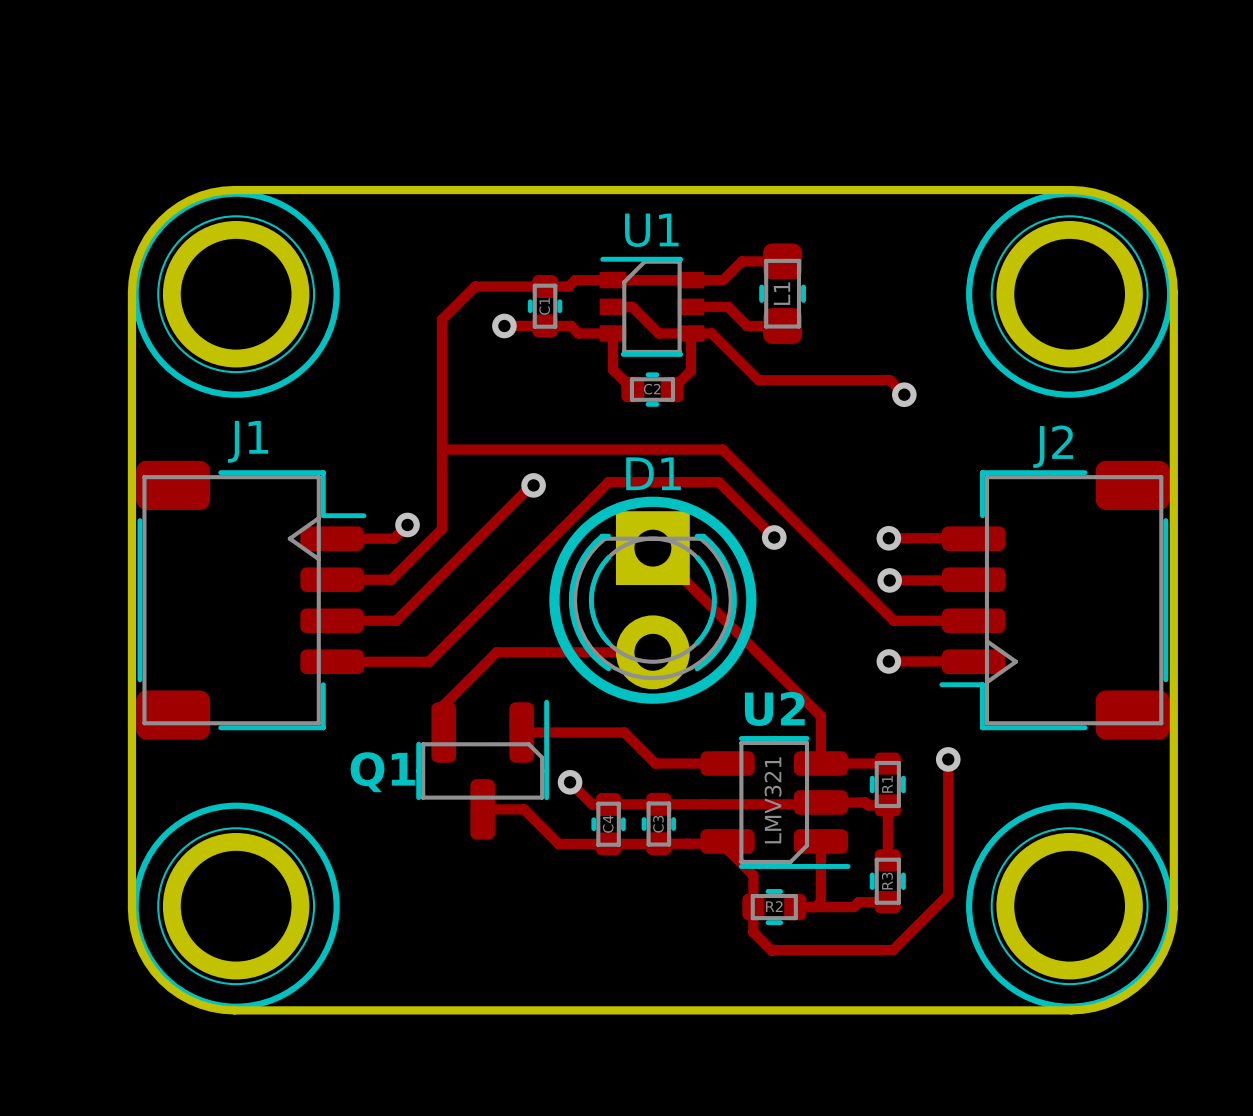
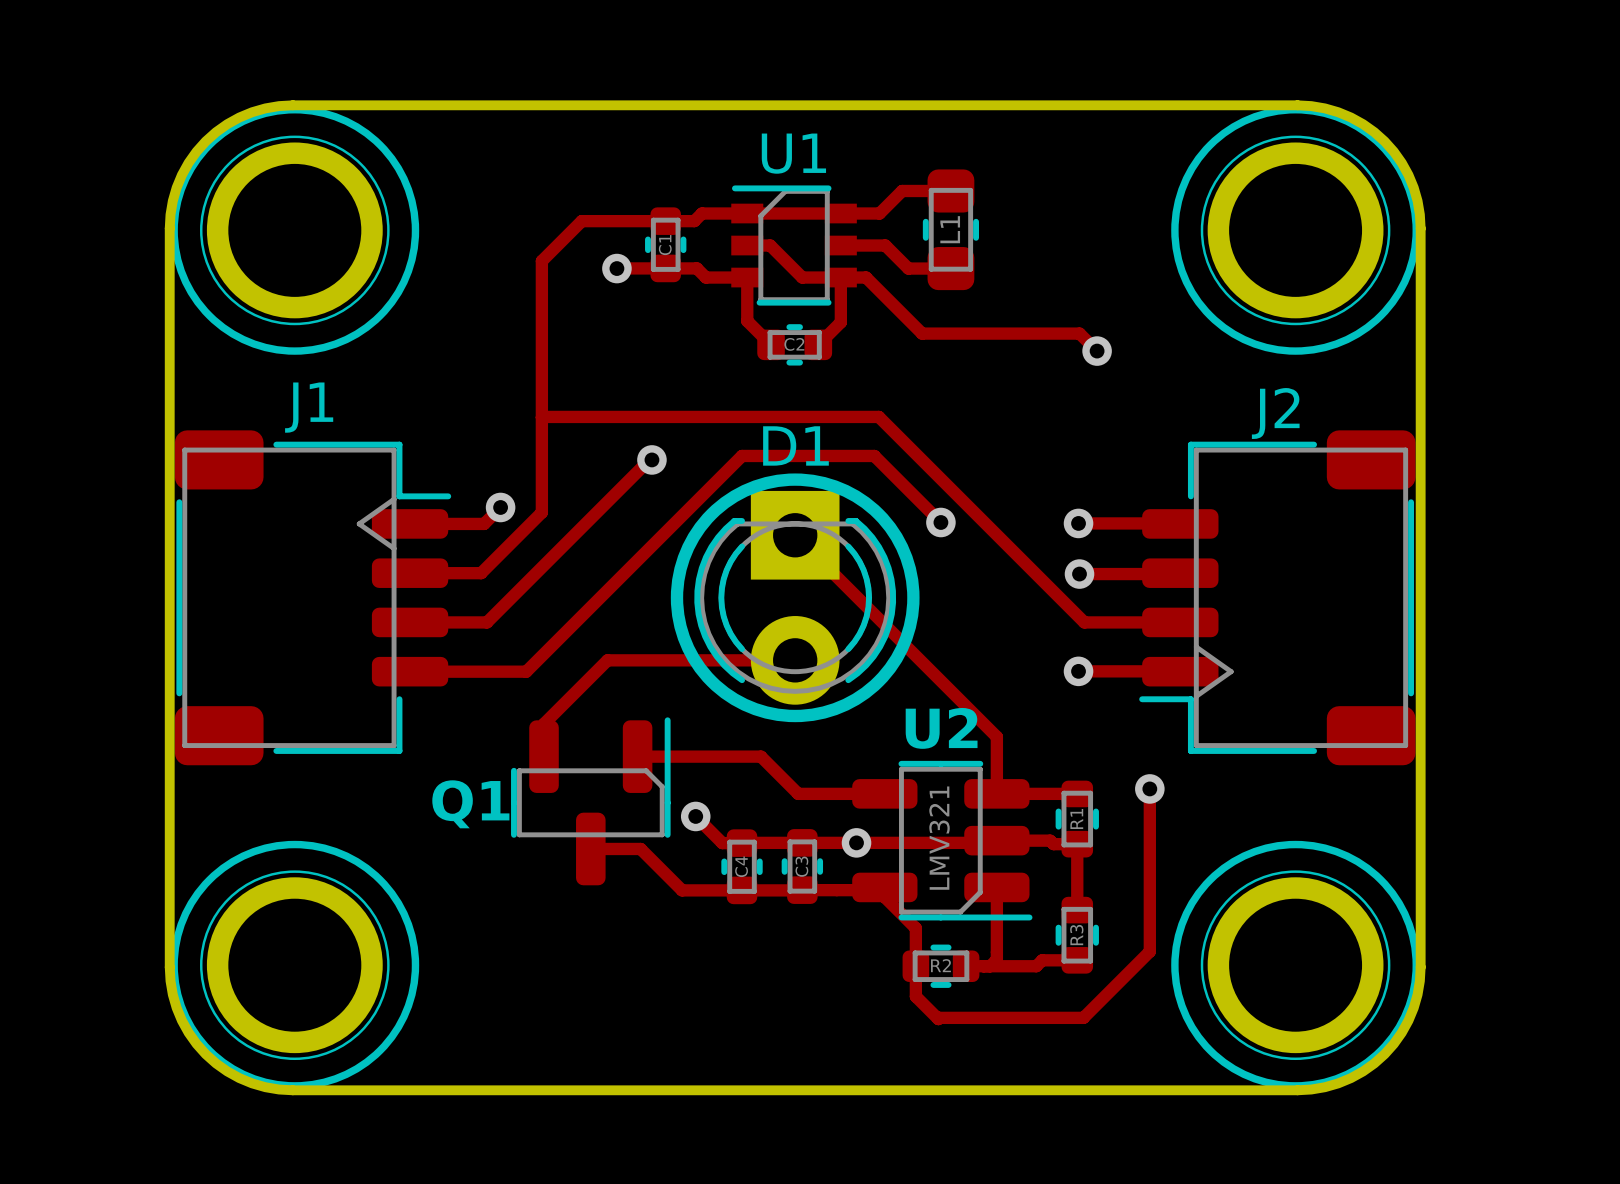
via: none -> (856, 842)

